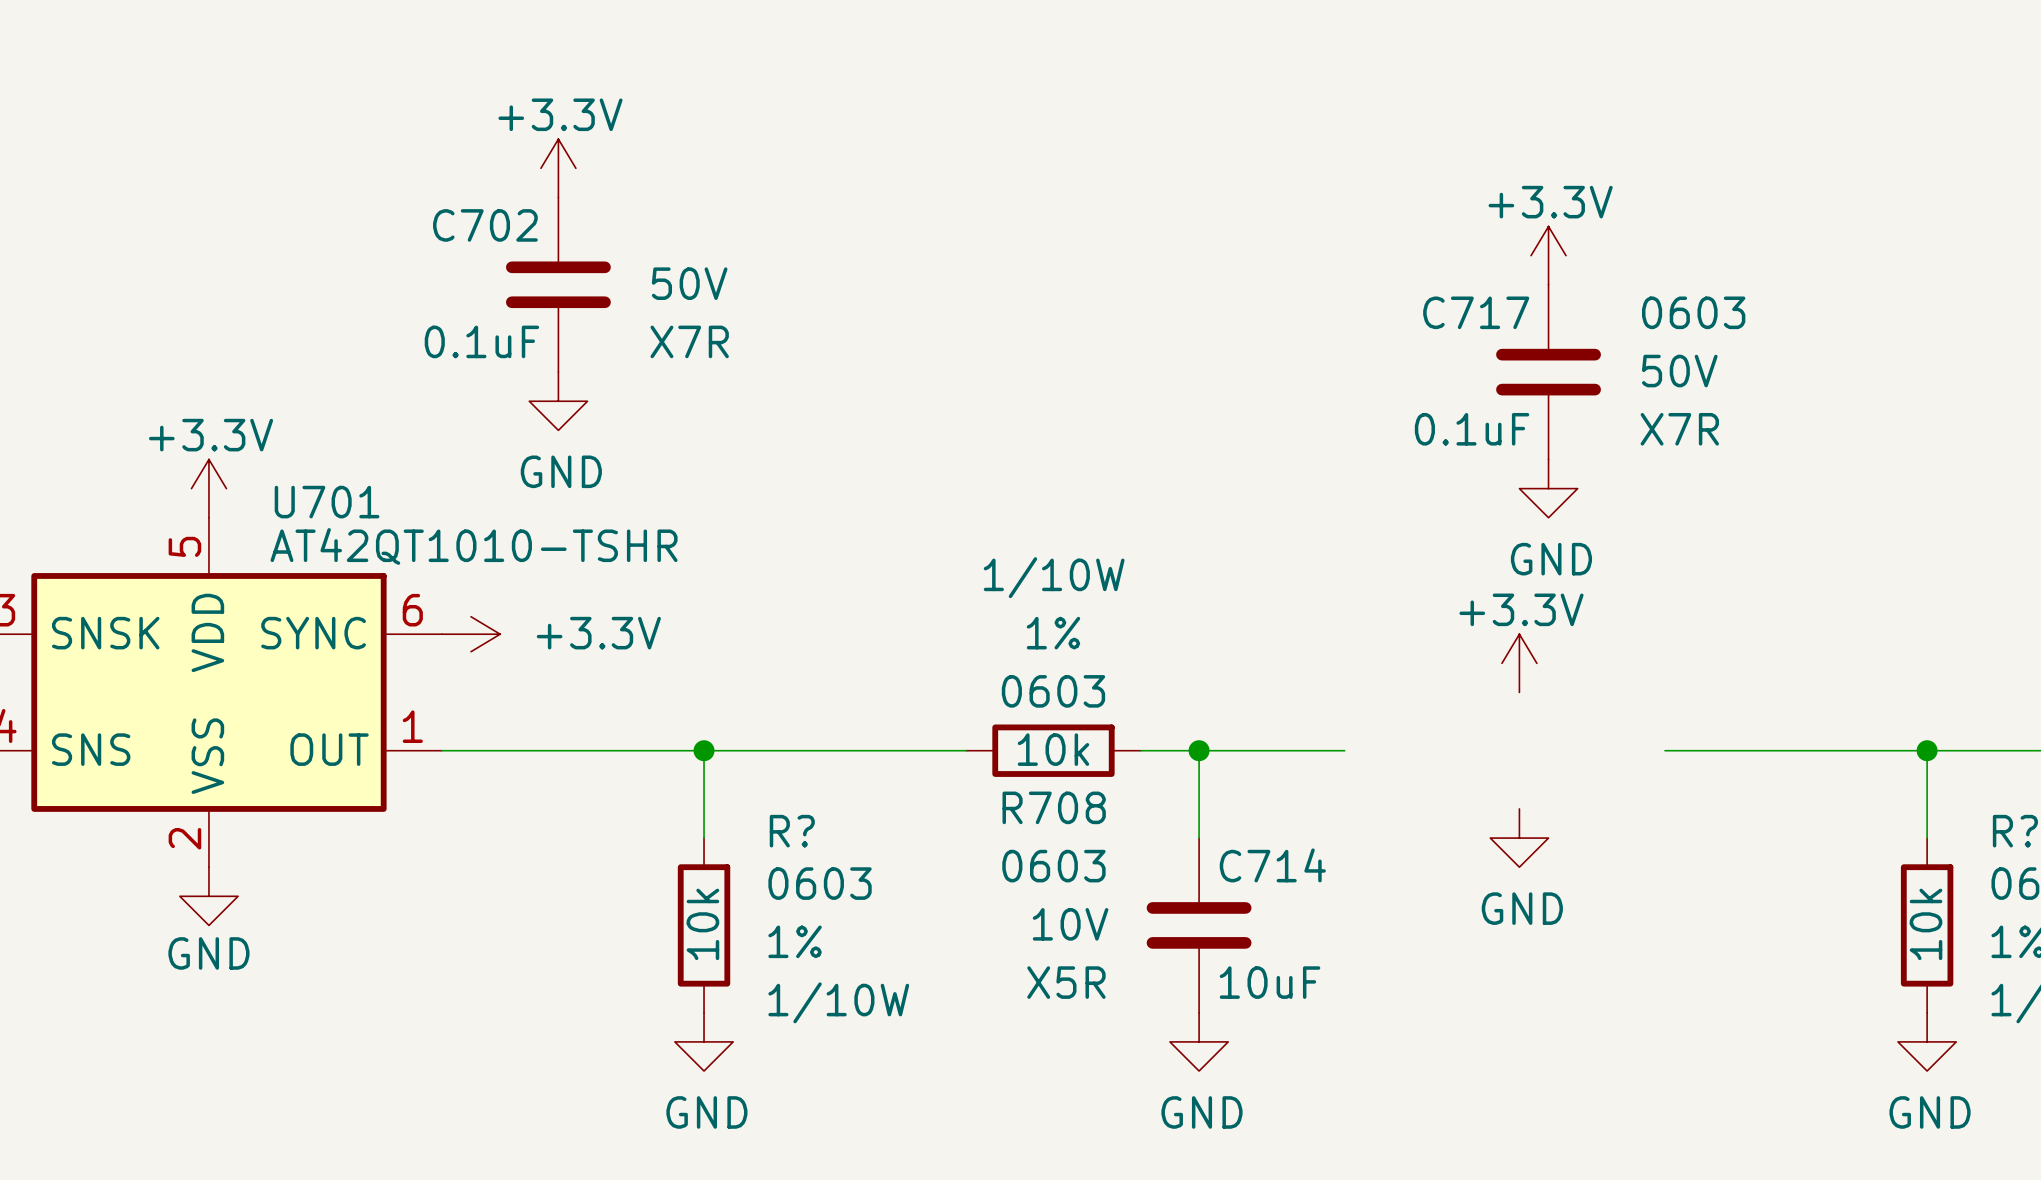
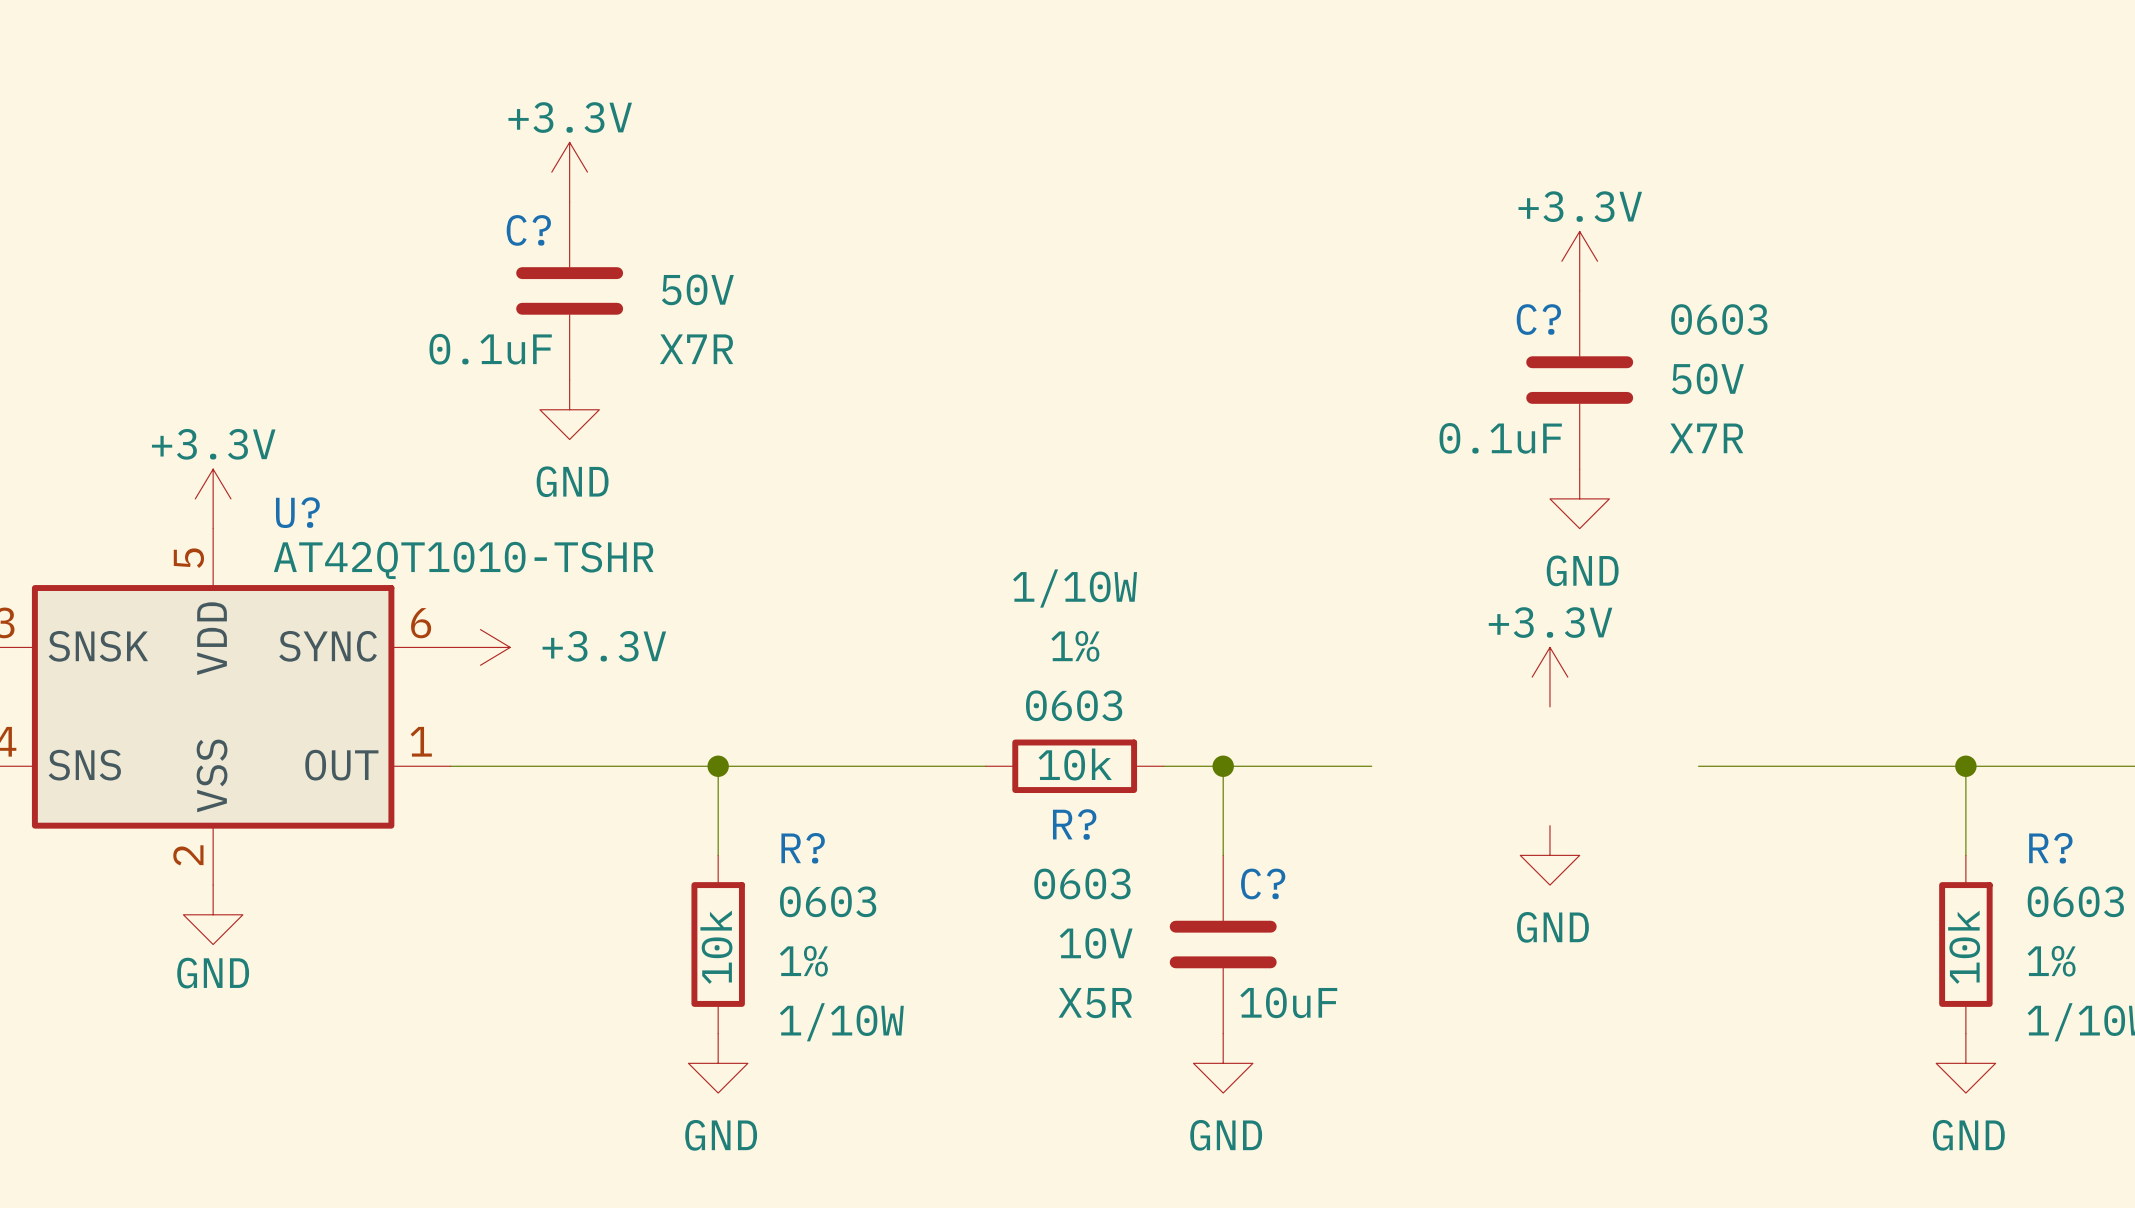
C702 name: C702 (485, 225) -> C? (528, 230)
C717 name: C717 (1476, 312) -> C? (1538, 319)
U701 name: U701 (327, 502) -> U? (297, 512)
R708 name: R708 (1054, 807) -> R? (1074, 824)
C714 name: C714 (1272, 865) -> C? (1263, 883)

